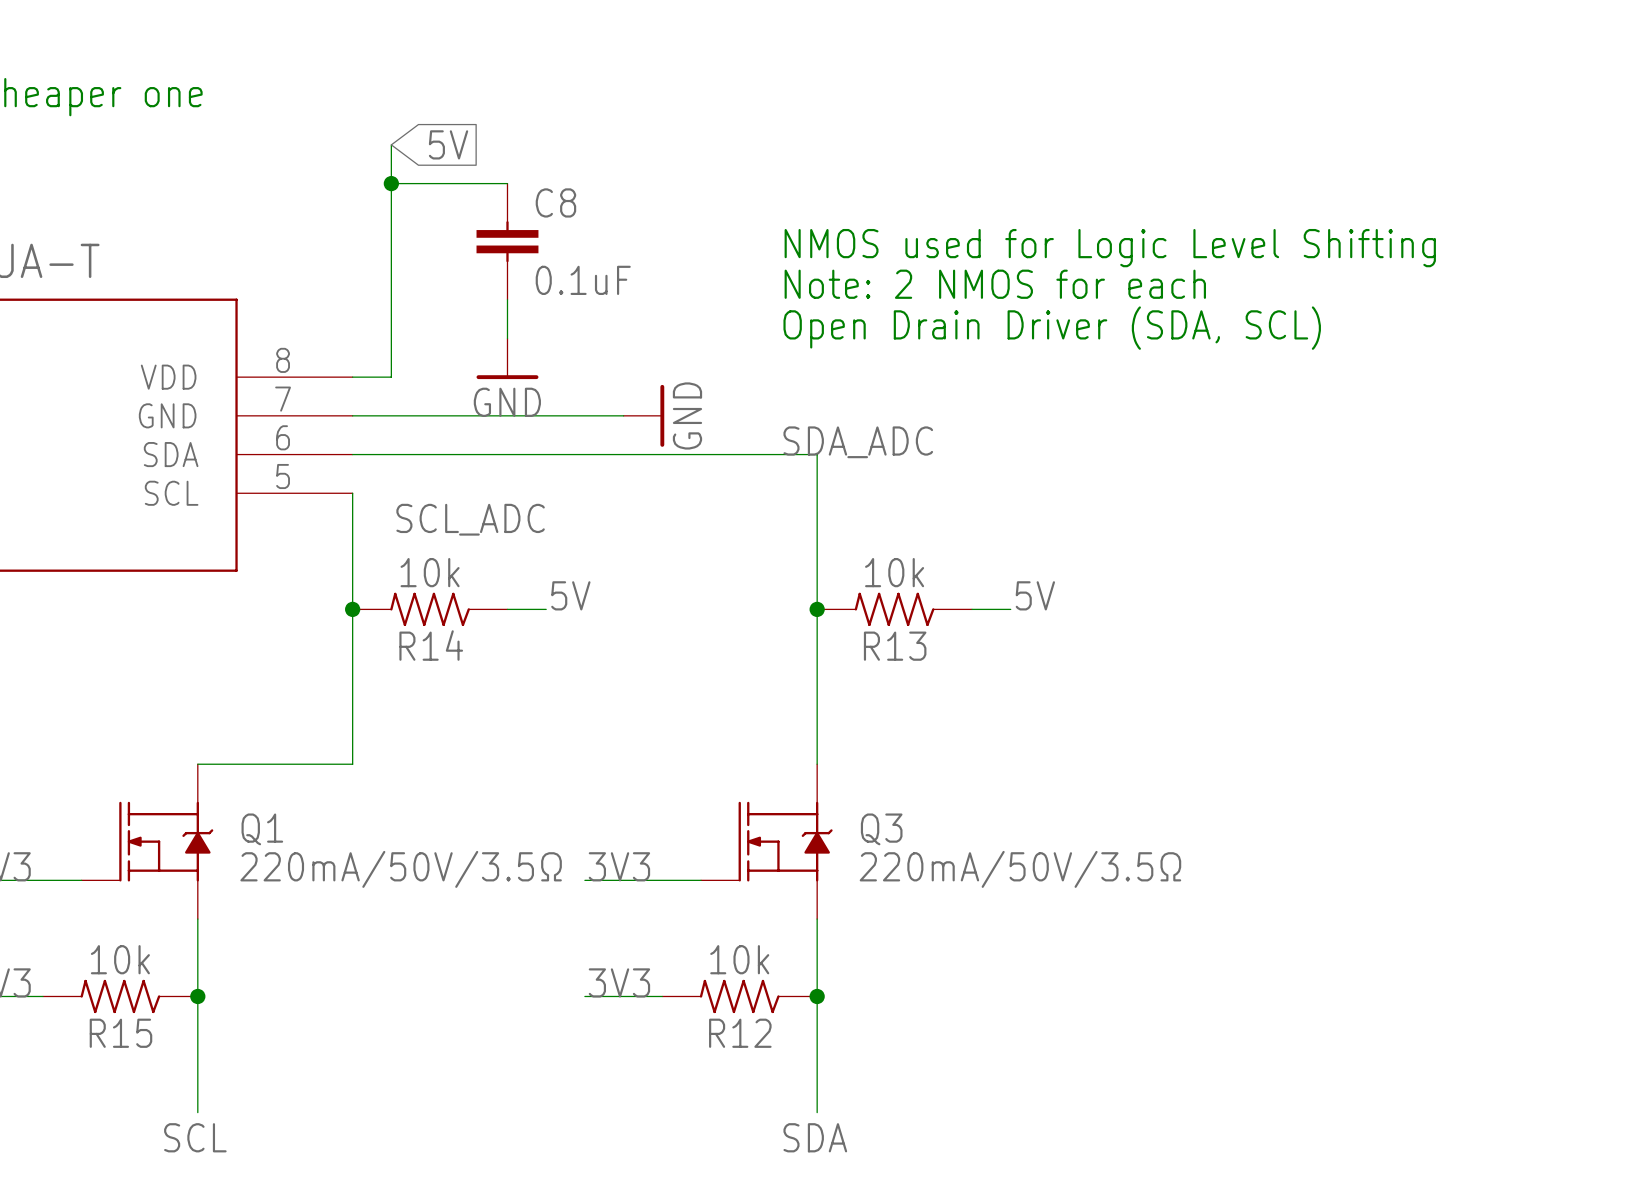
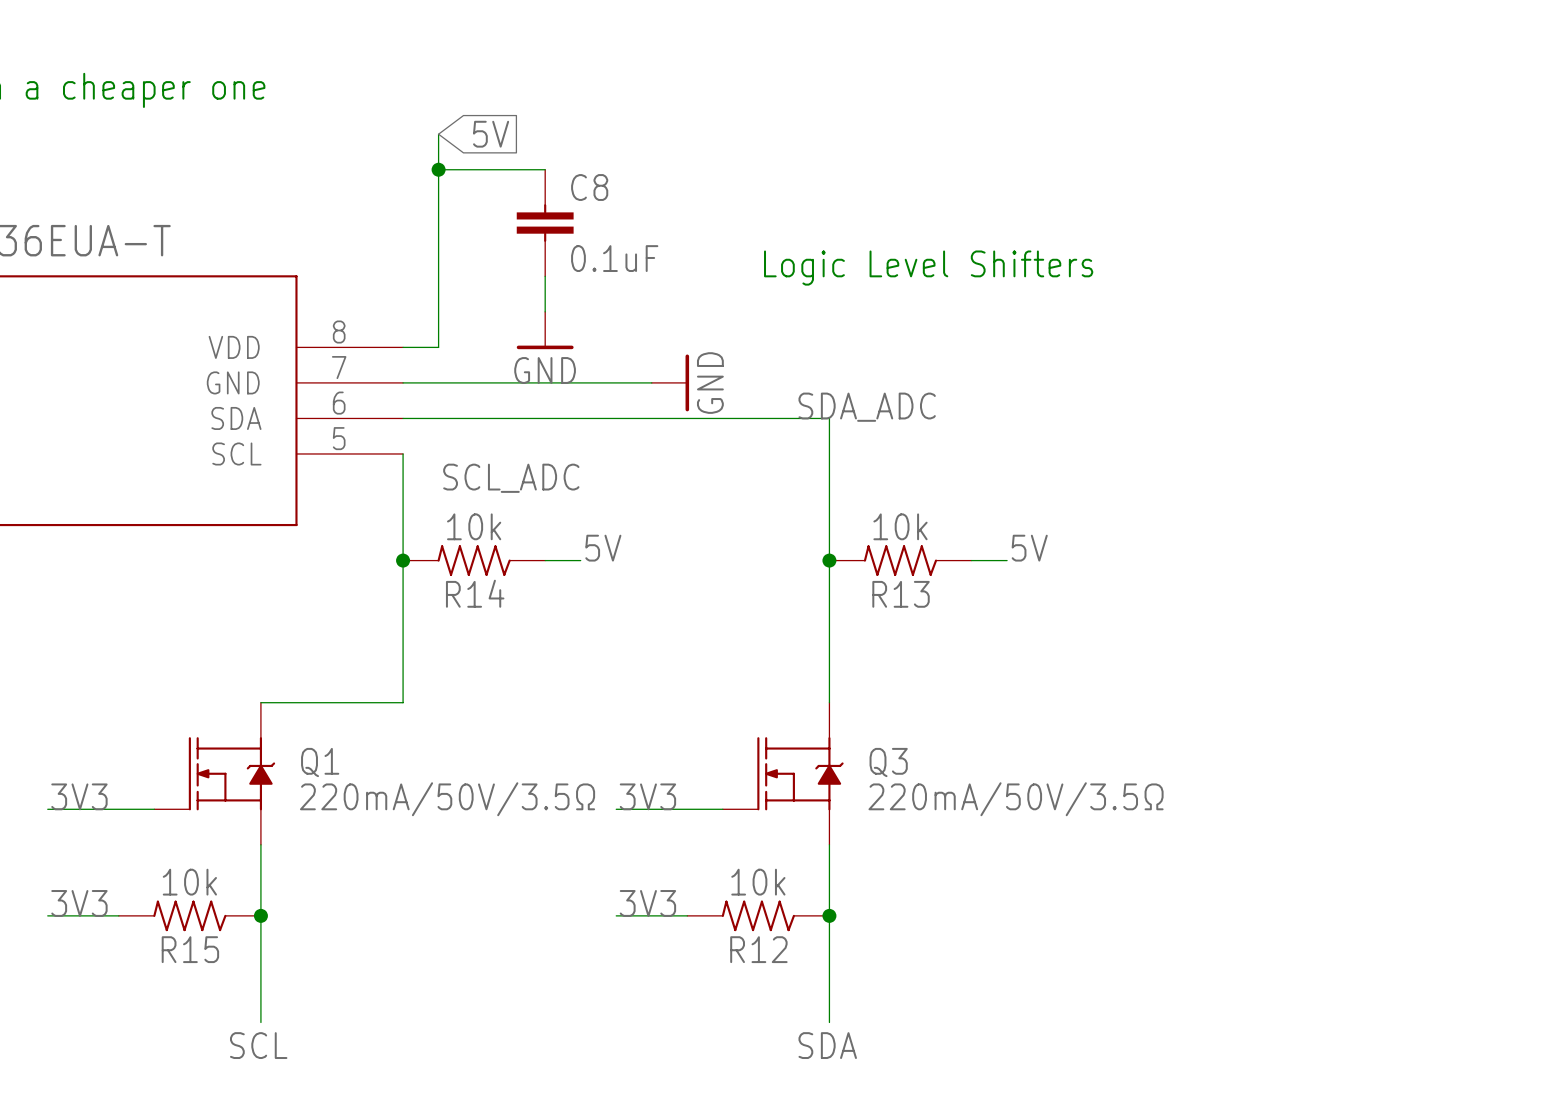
text: NMOS used for Logic Level Shifting (1110, 248) -> Logic Level Shifters (928, 268)
text: Note: 2 NMOS for each (995, 284) -> none
text: Open Drain Driver (SDA, SCL) (1052, 328) -> none

